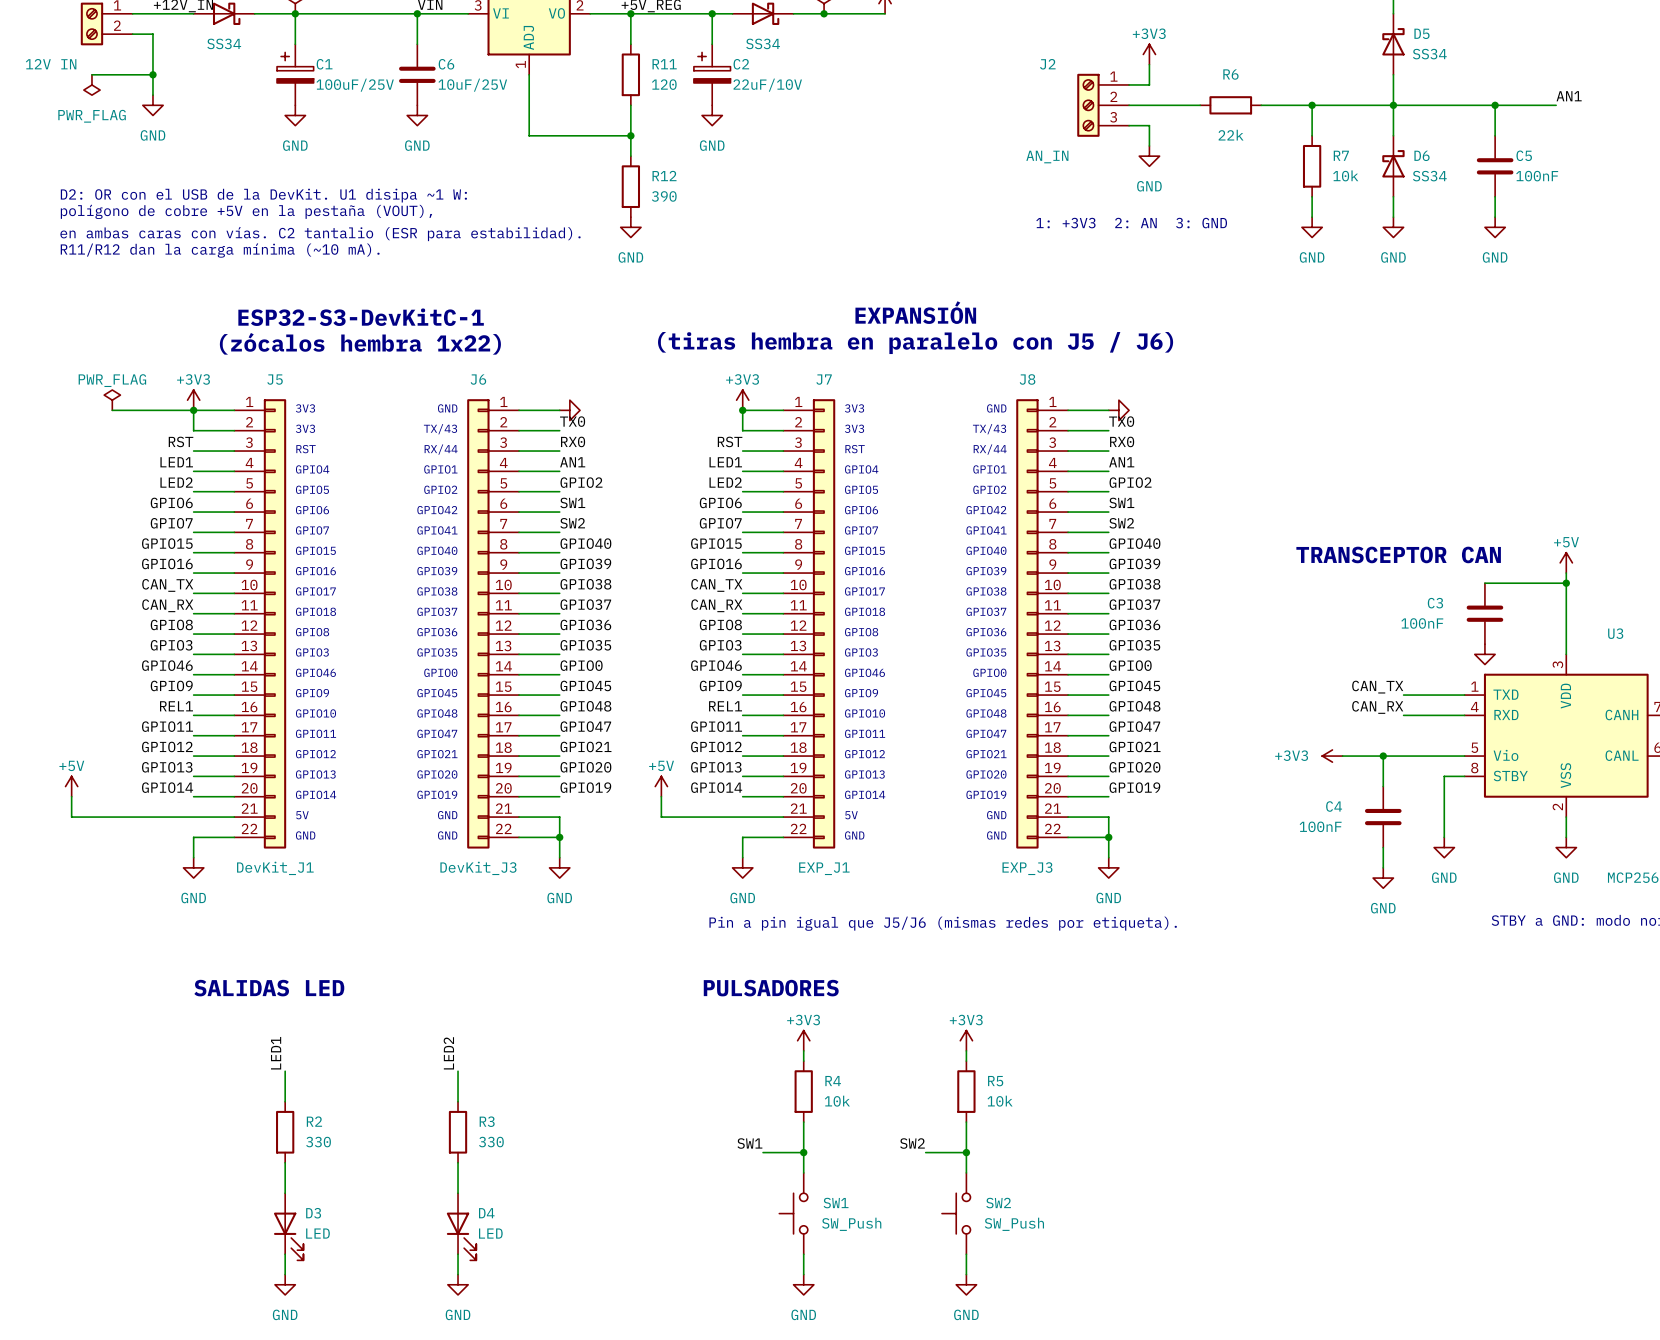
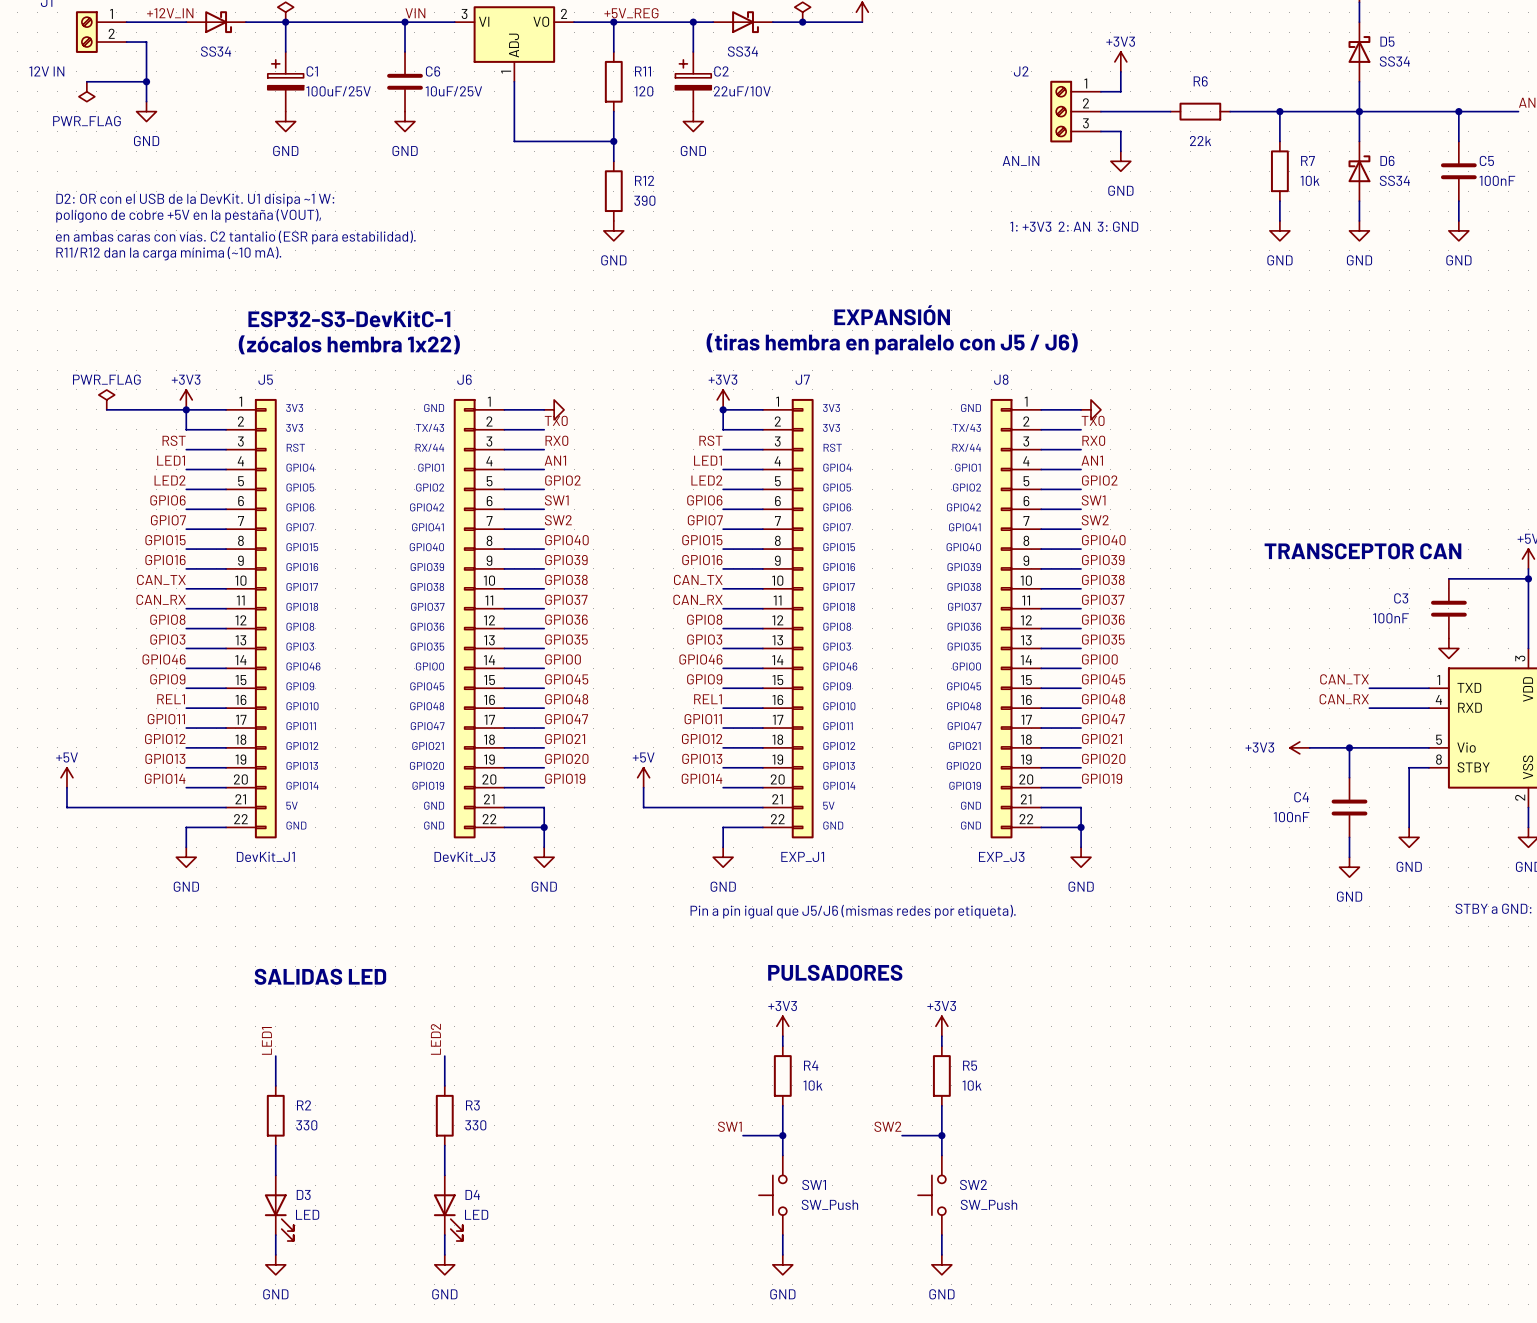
text position: SALIDAS LED (269, 988) -> SALIDAS LED (320, 976)
text position: PULSADORES (771, 988) -> PULSADORES (835, 972)

